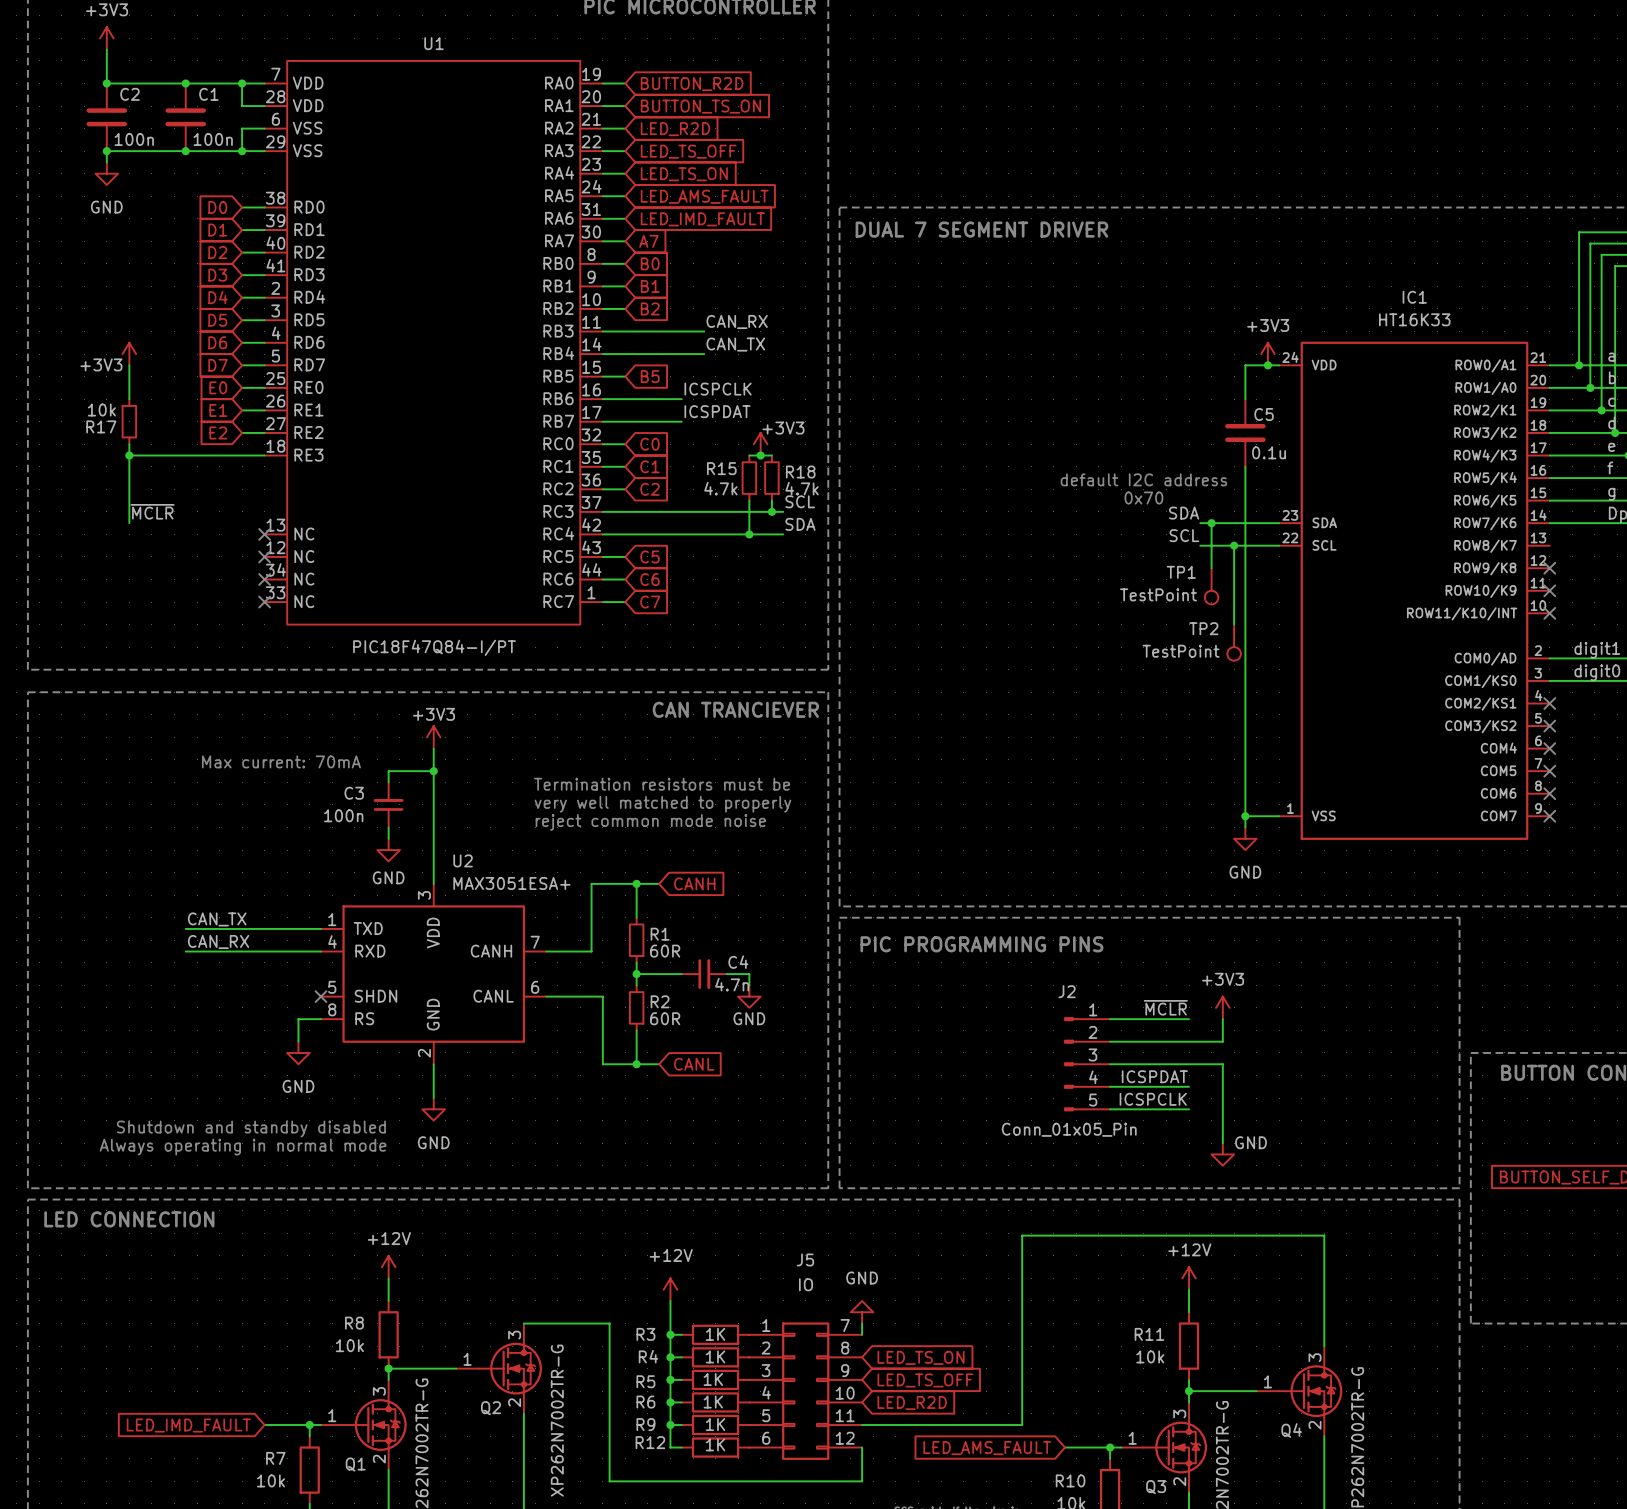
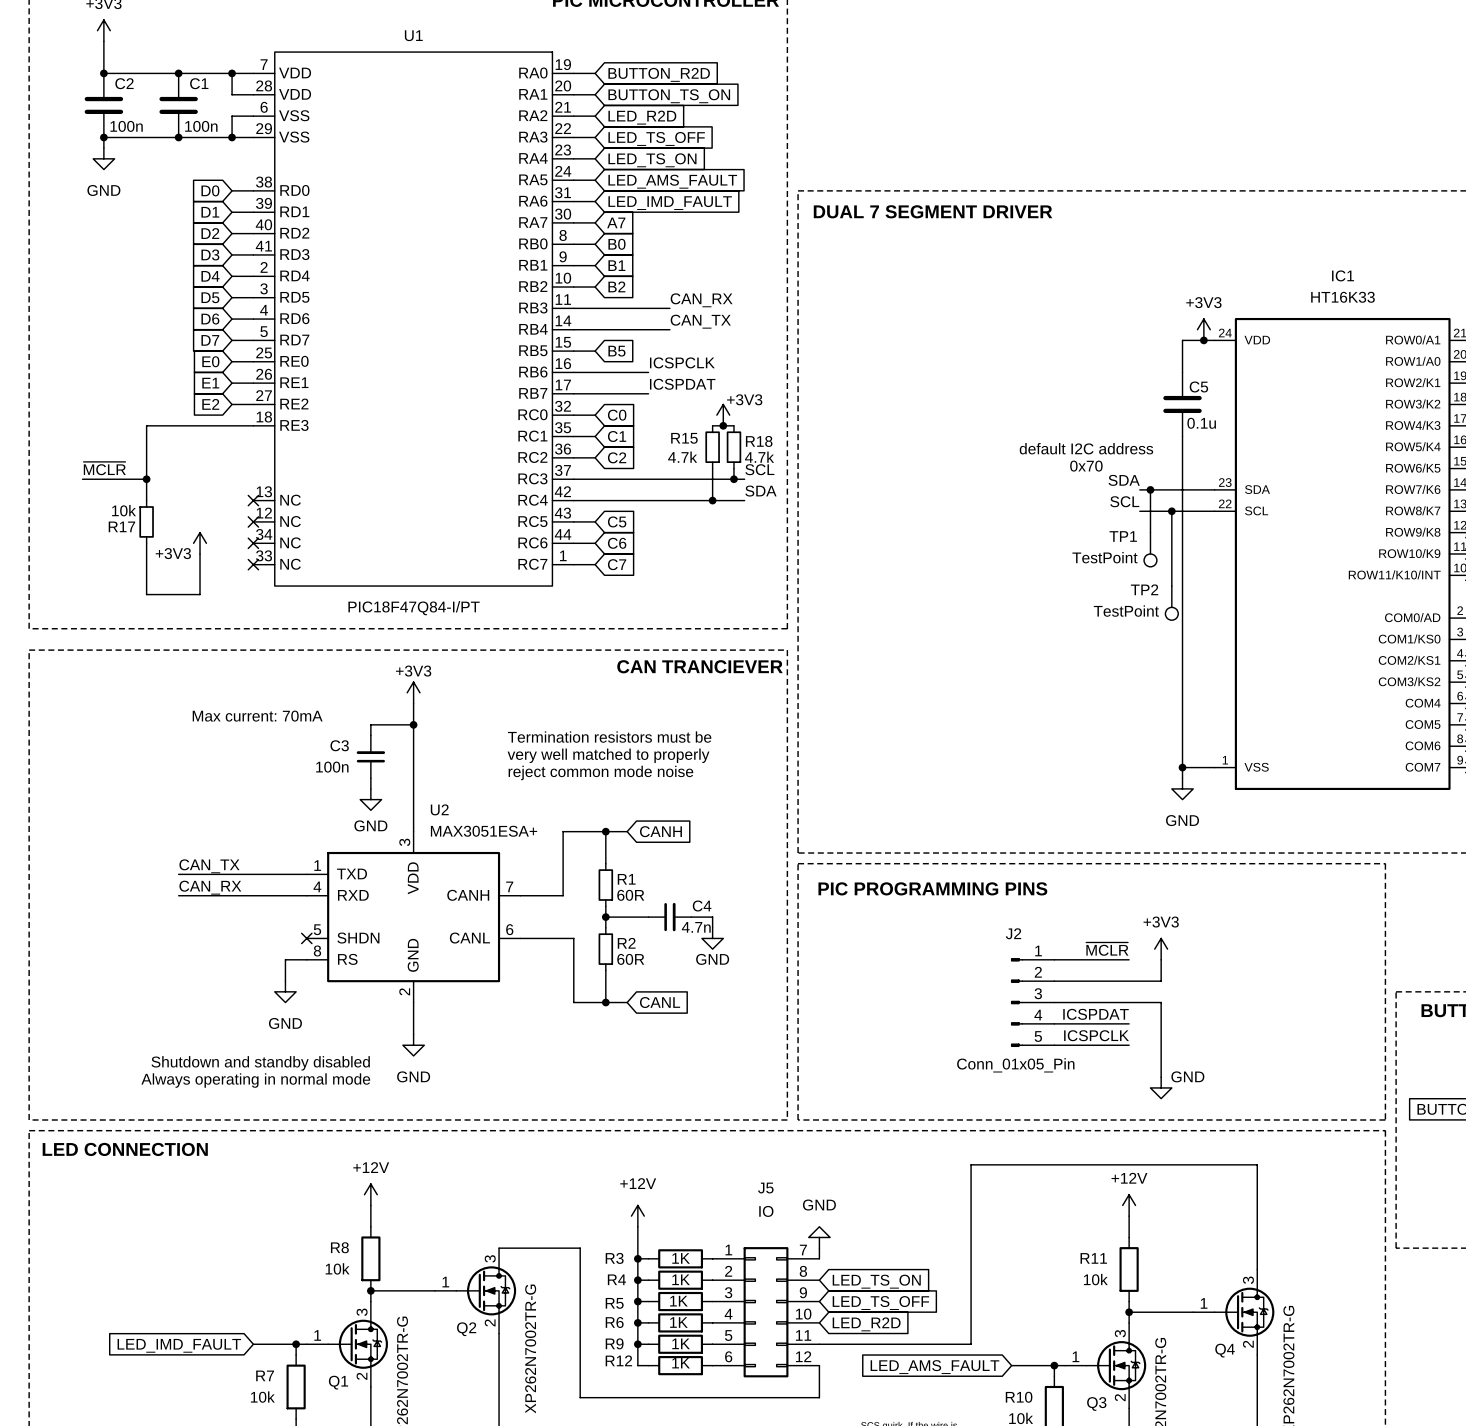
power symbol: +3V3 (129, 354) -> none
wire: (129, 365) (129, 399) -> none
R17 position: (129, 421) -> (146, 521)
wire: (129, 444) (129, 523) -> none
wire: (129, 455) (151, 455) -> (146, 500) (146, 425)
junction: (129, 455) -> none
wire: none -> (82, 479) (146, 479)
junction: none -> (146, 479)
label position: ~{MCLR} (152, 511) -> ~{MCLR} (104, 468)
wire: none -> (146, 543) (146, 594) (200, 594) (200, 553)
power symbol: none -> +3V3 (200, 543)

